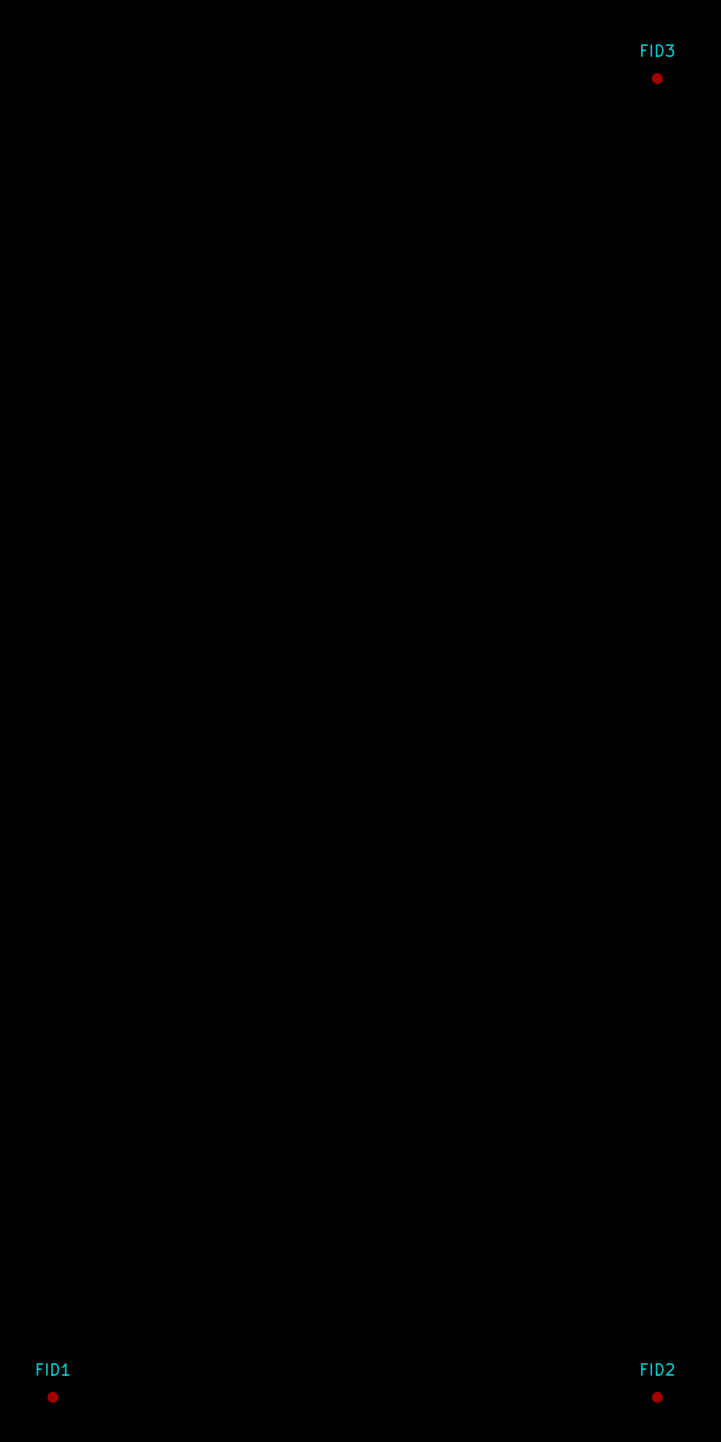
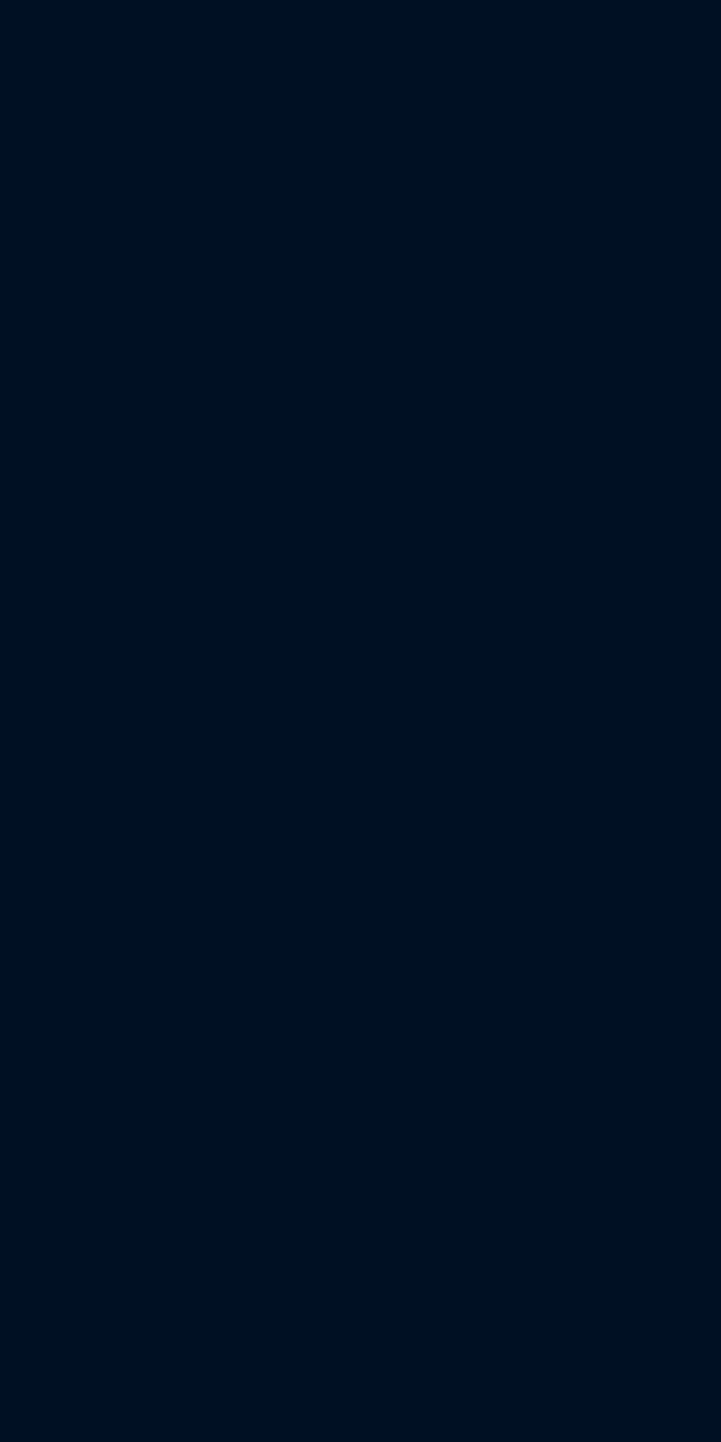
FID3: (657, 78) -> none
FID1: (52, 1397) -> none
FID2: (657, 1397) -> none

